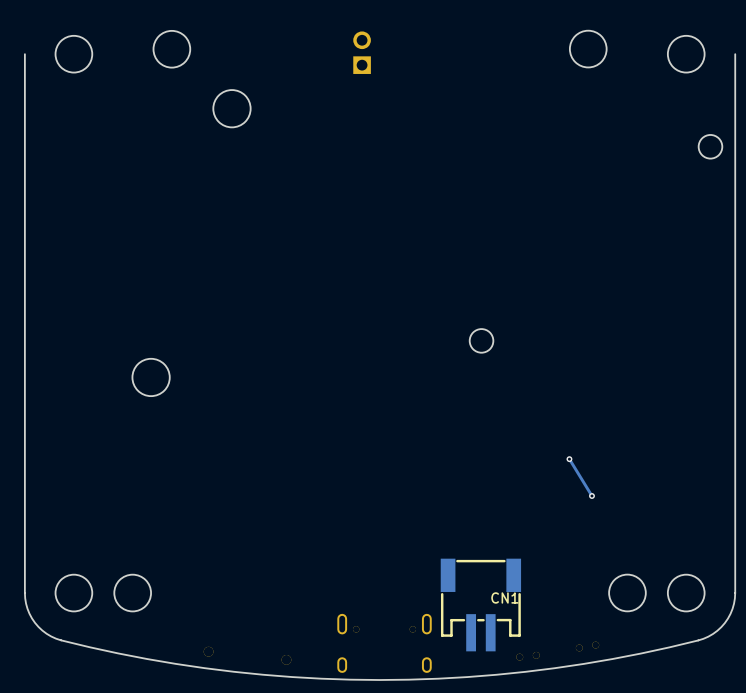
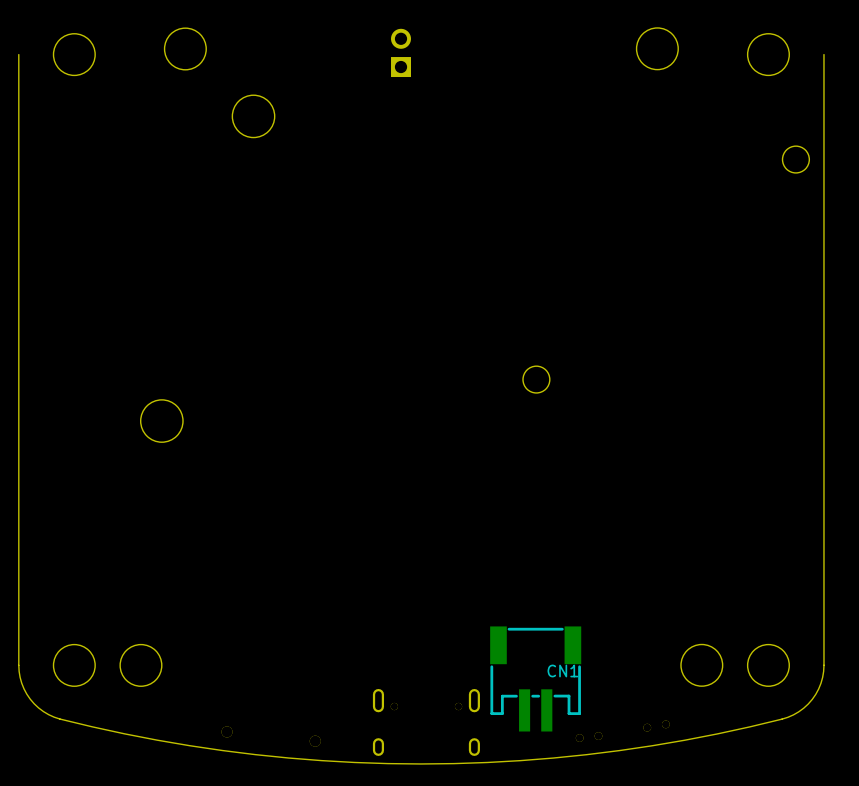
track: (569, 459) (591, 496) -> none
via: (569, 459) -> none
via: (591, 496) -> none

